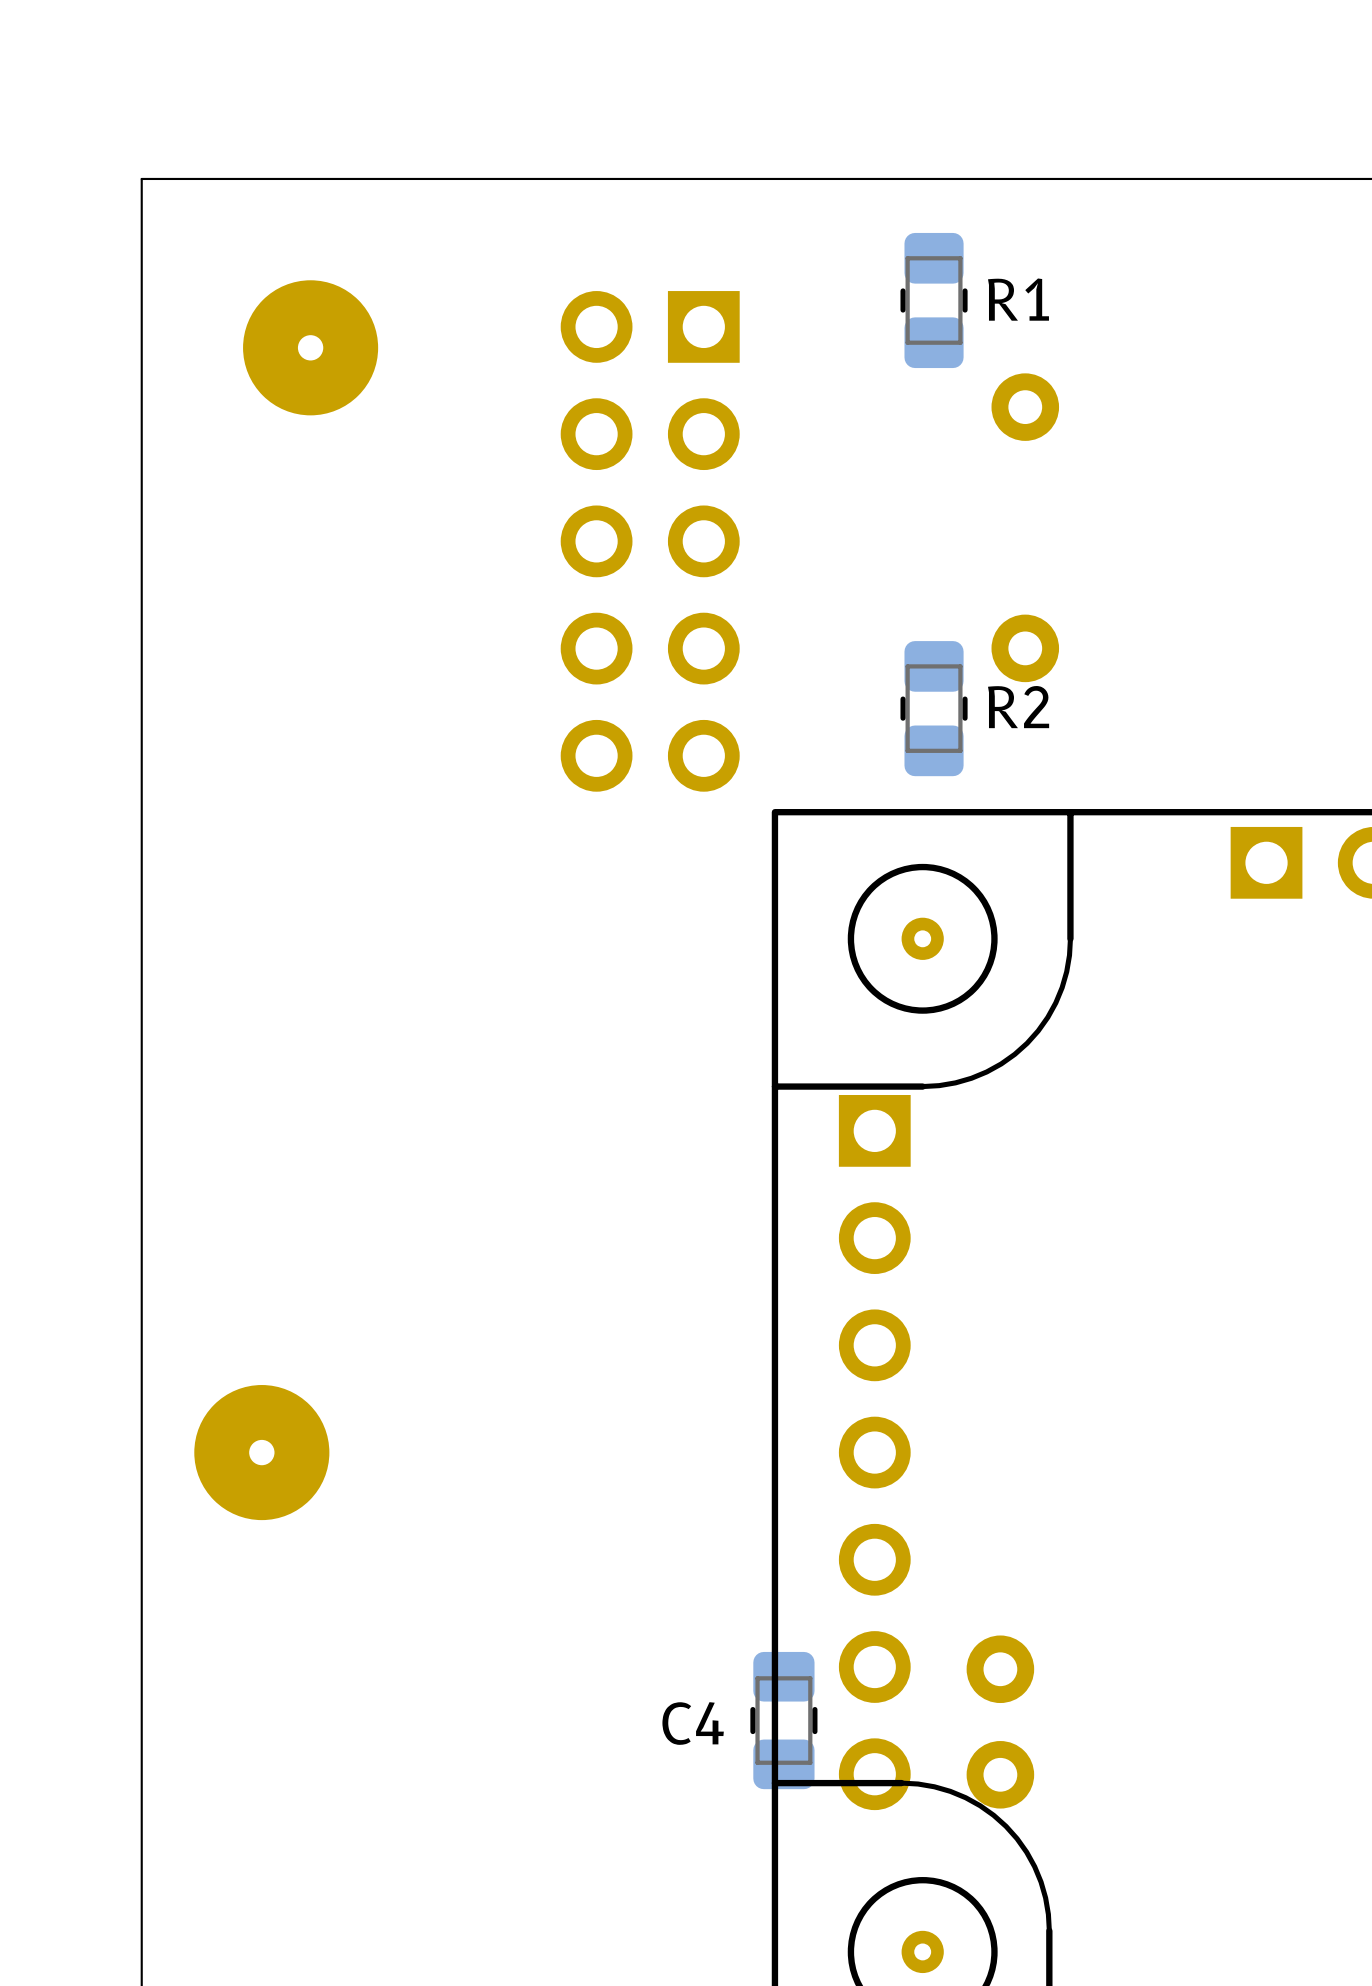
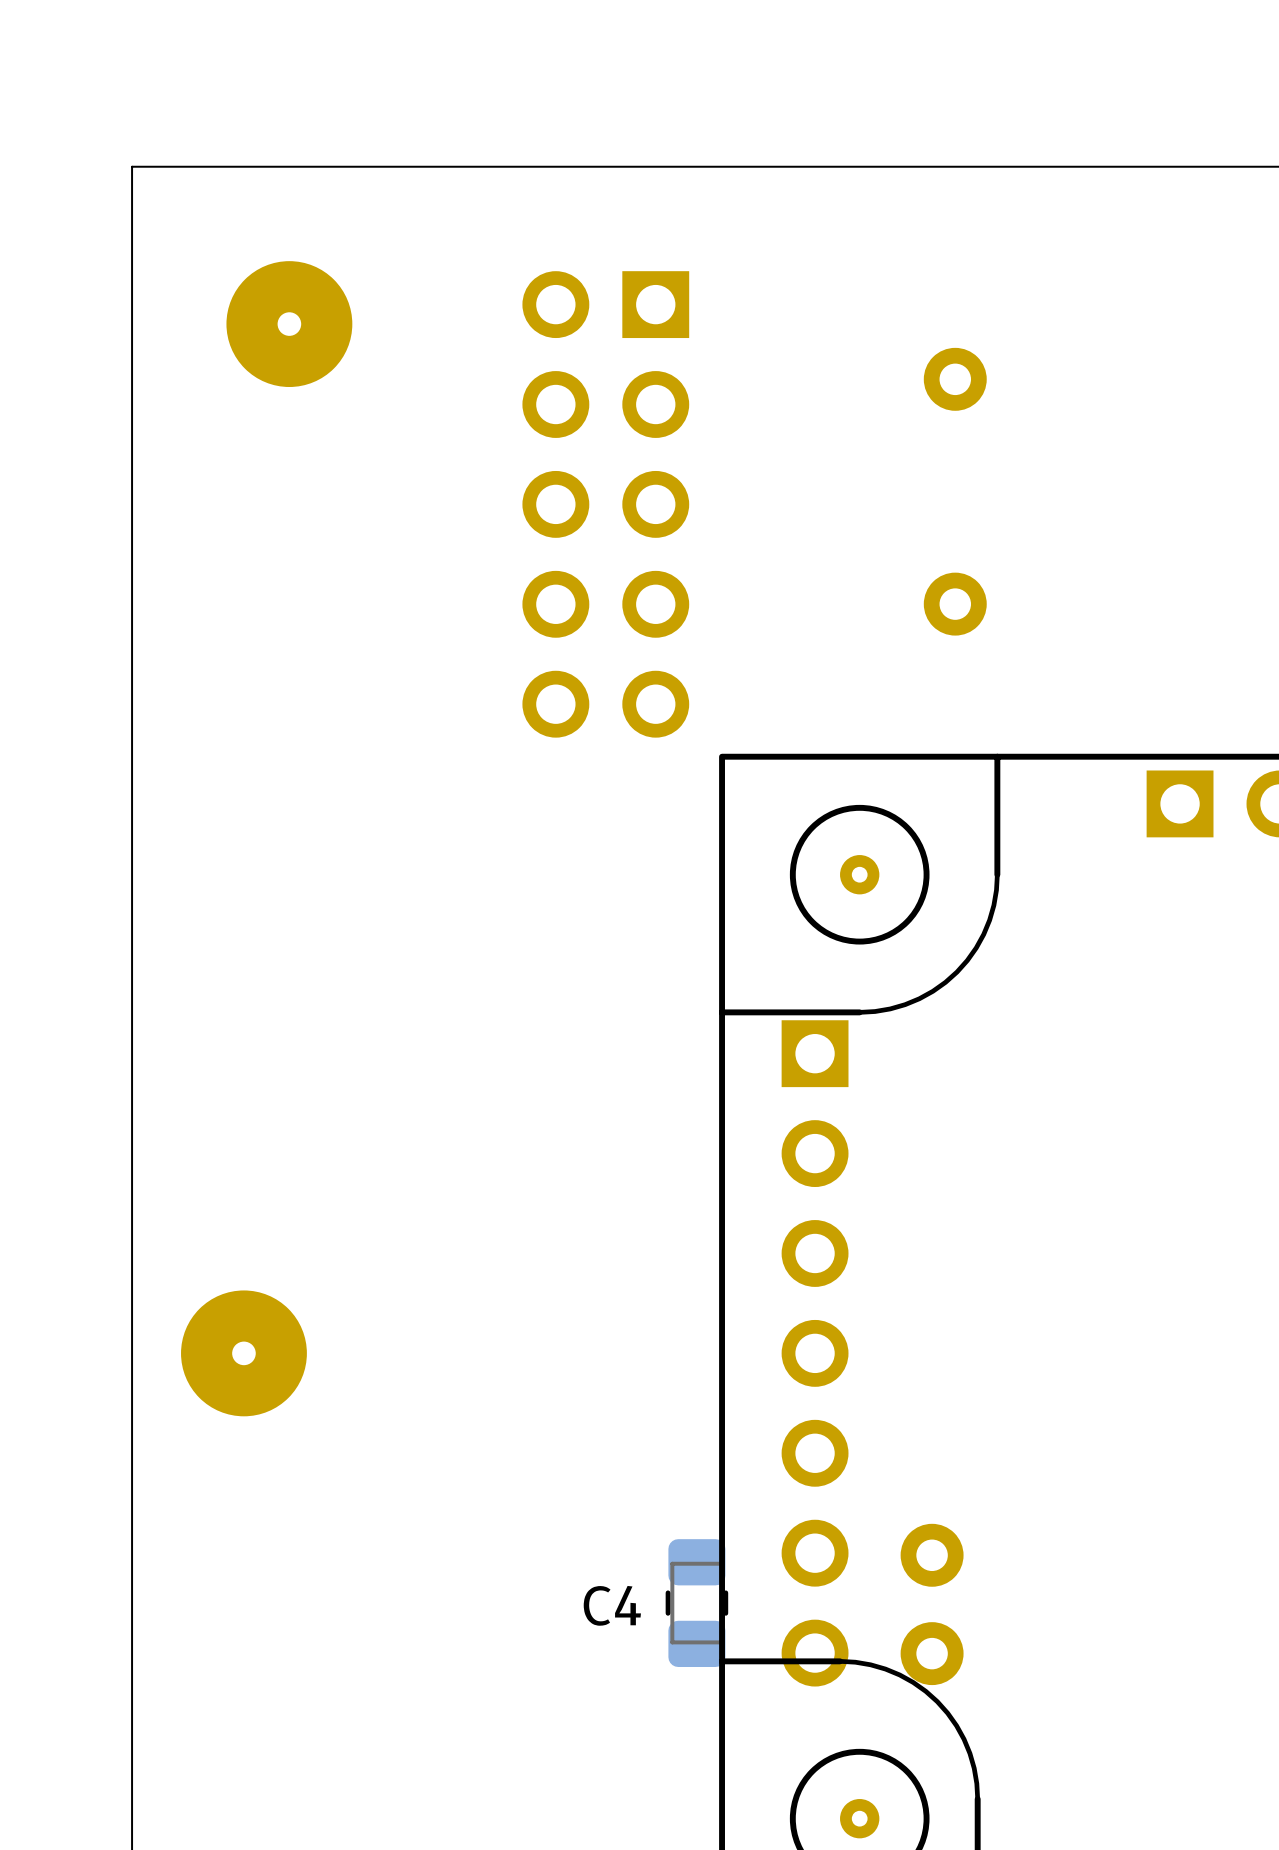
R1: (934, 300) -> none
R2: (934, 708) -> none
C4 position: (783, 1720) -> (696, 1603)

